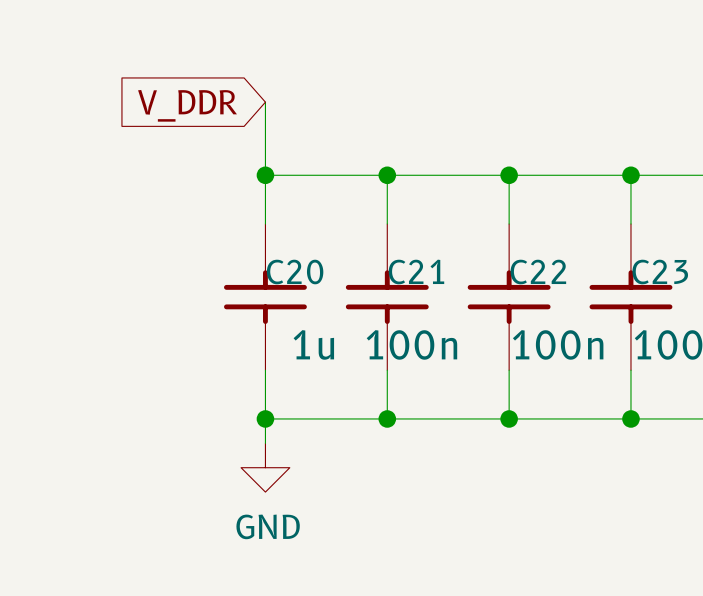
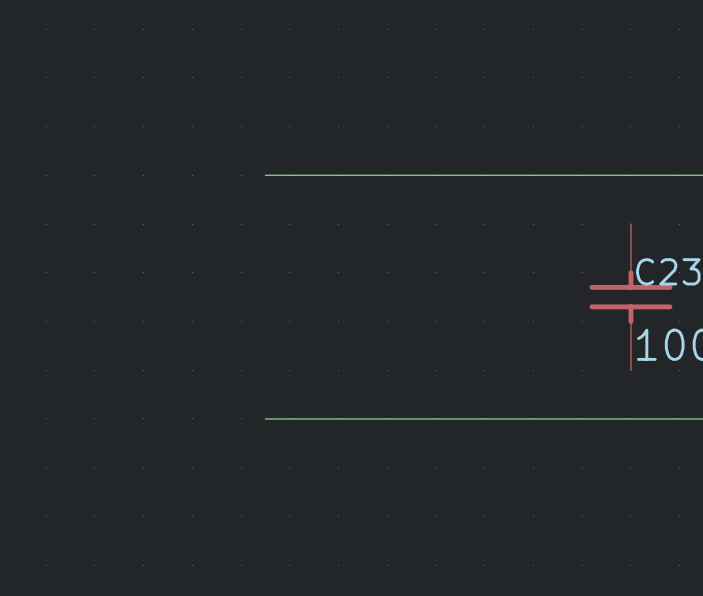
wire: (265, 102) (265, 224) -> none
global label: V_DDR (187, 105) -> none
junction: (265, 175) -> none
wire: (387, 175) (387, 224) -> none
junction: (387, 175) -> none
wire: (509, 175) (509, 224) -> none
junction: (509, 175) -> none
wire: (630, 175) (630, 224) -> none
junction: (630, 175) -> none
C20: 1u (265, 297) -> none
C21: 100n (387, 297) -> none
C22: 100n (509, 297) -> none
wire: (265, 370) (265, 443) -> none
wire: (387, 370) (387, 418) -> none
wire: (509, 370) (509, 418) -> none
wire: (630, 370) (630, 418) -> none
junction: (265, 418) -> none
junction: (387, 418) -> none
junction: (509, 418) -> none
junction: (630, 418) -> none
power symbol: GND (265, 467) -> none

